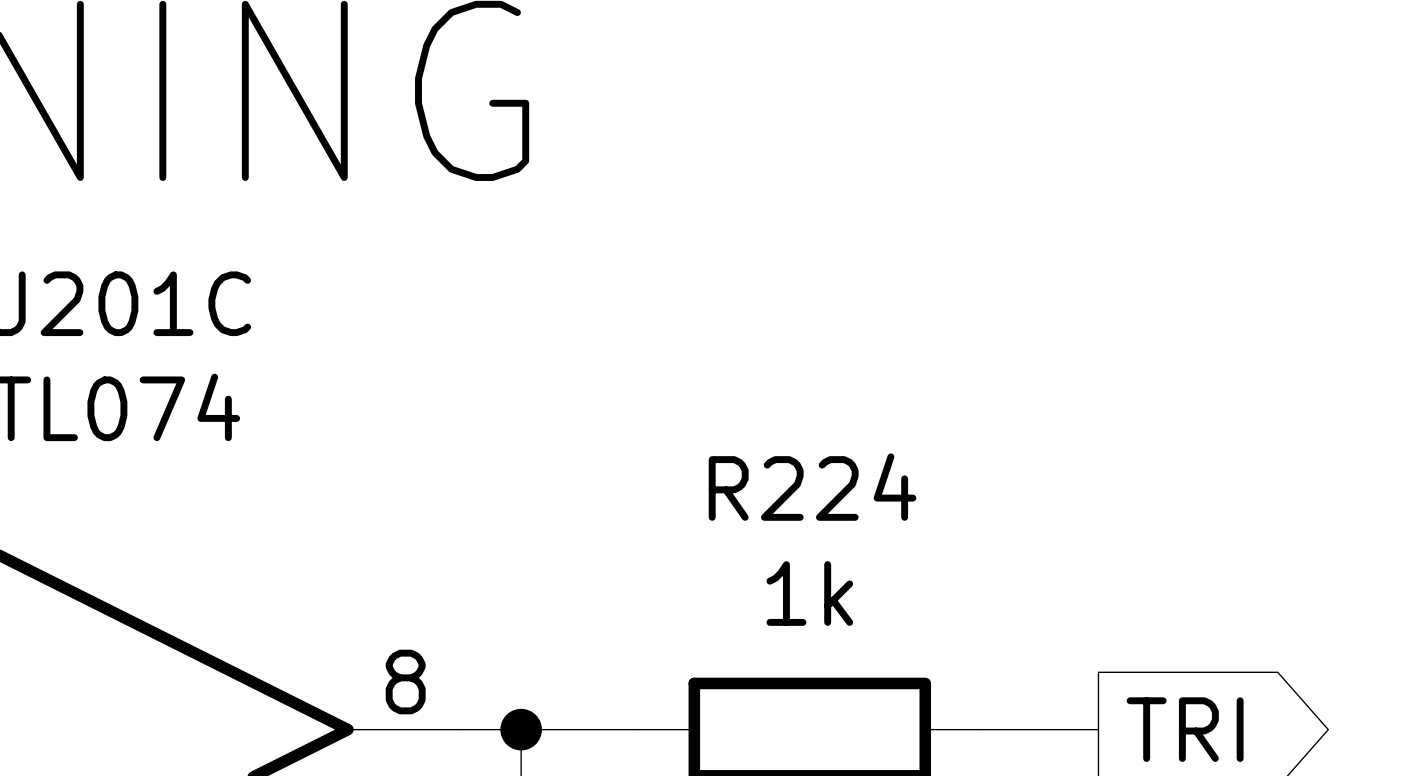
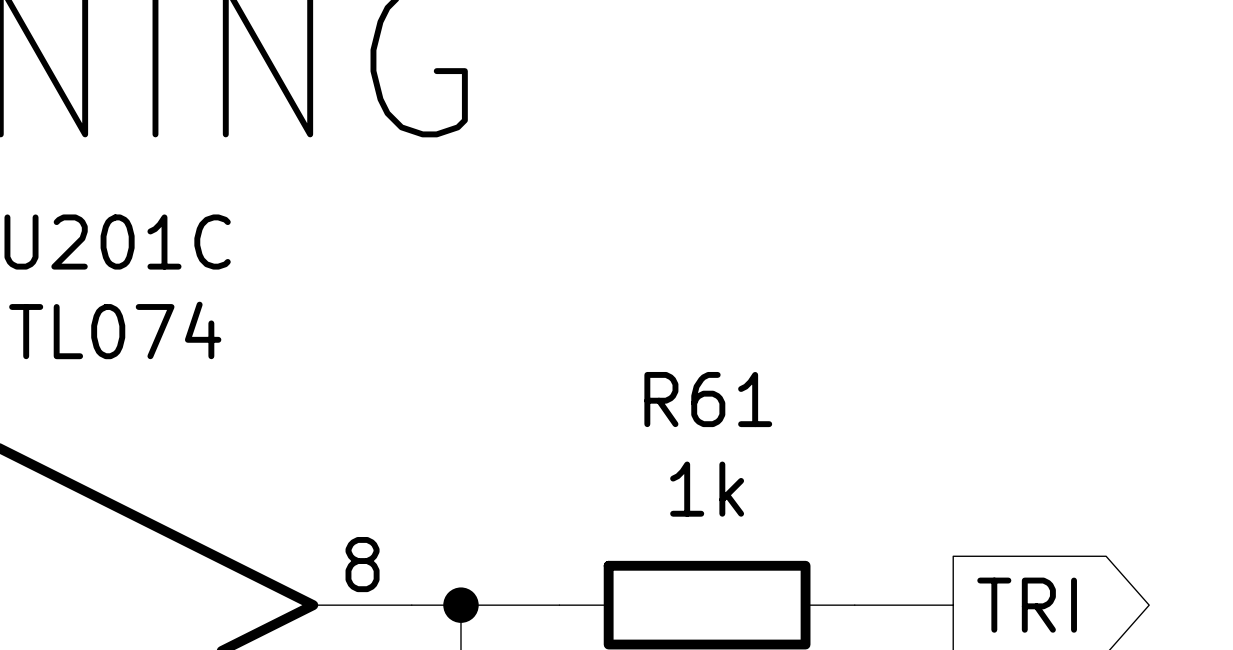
R224 name: R224 (812, 487) -> R61 (708, 399)

